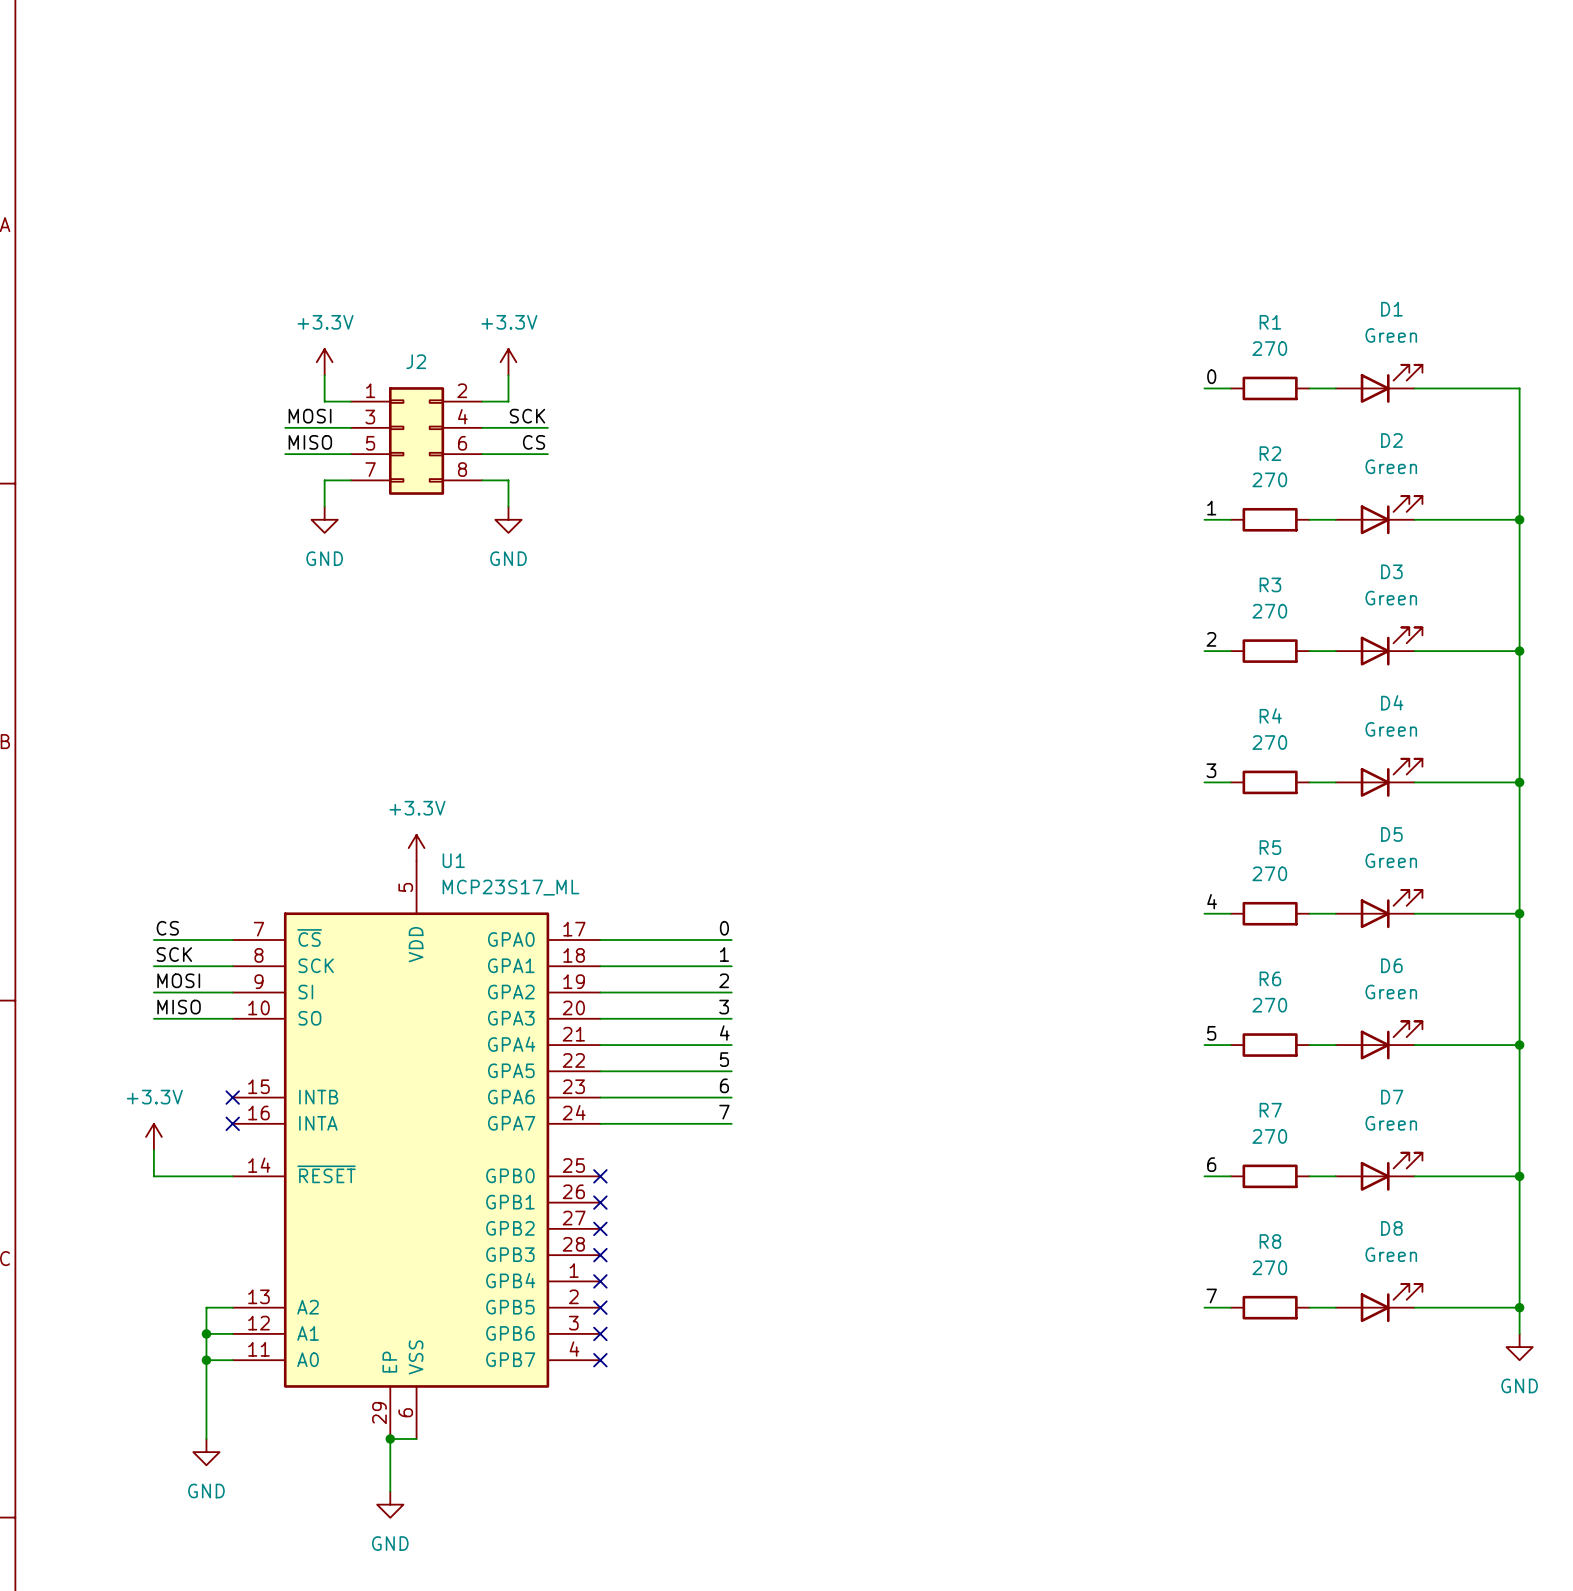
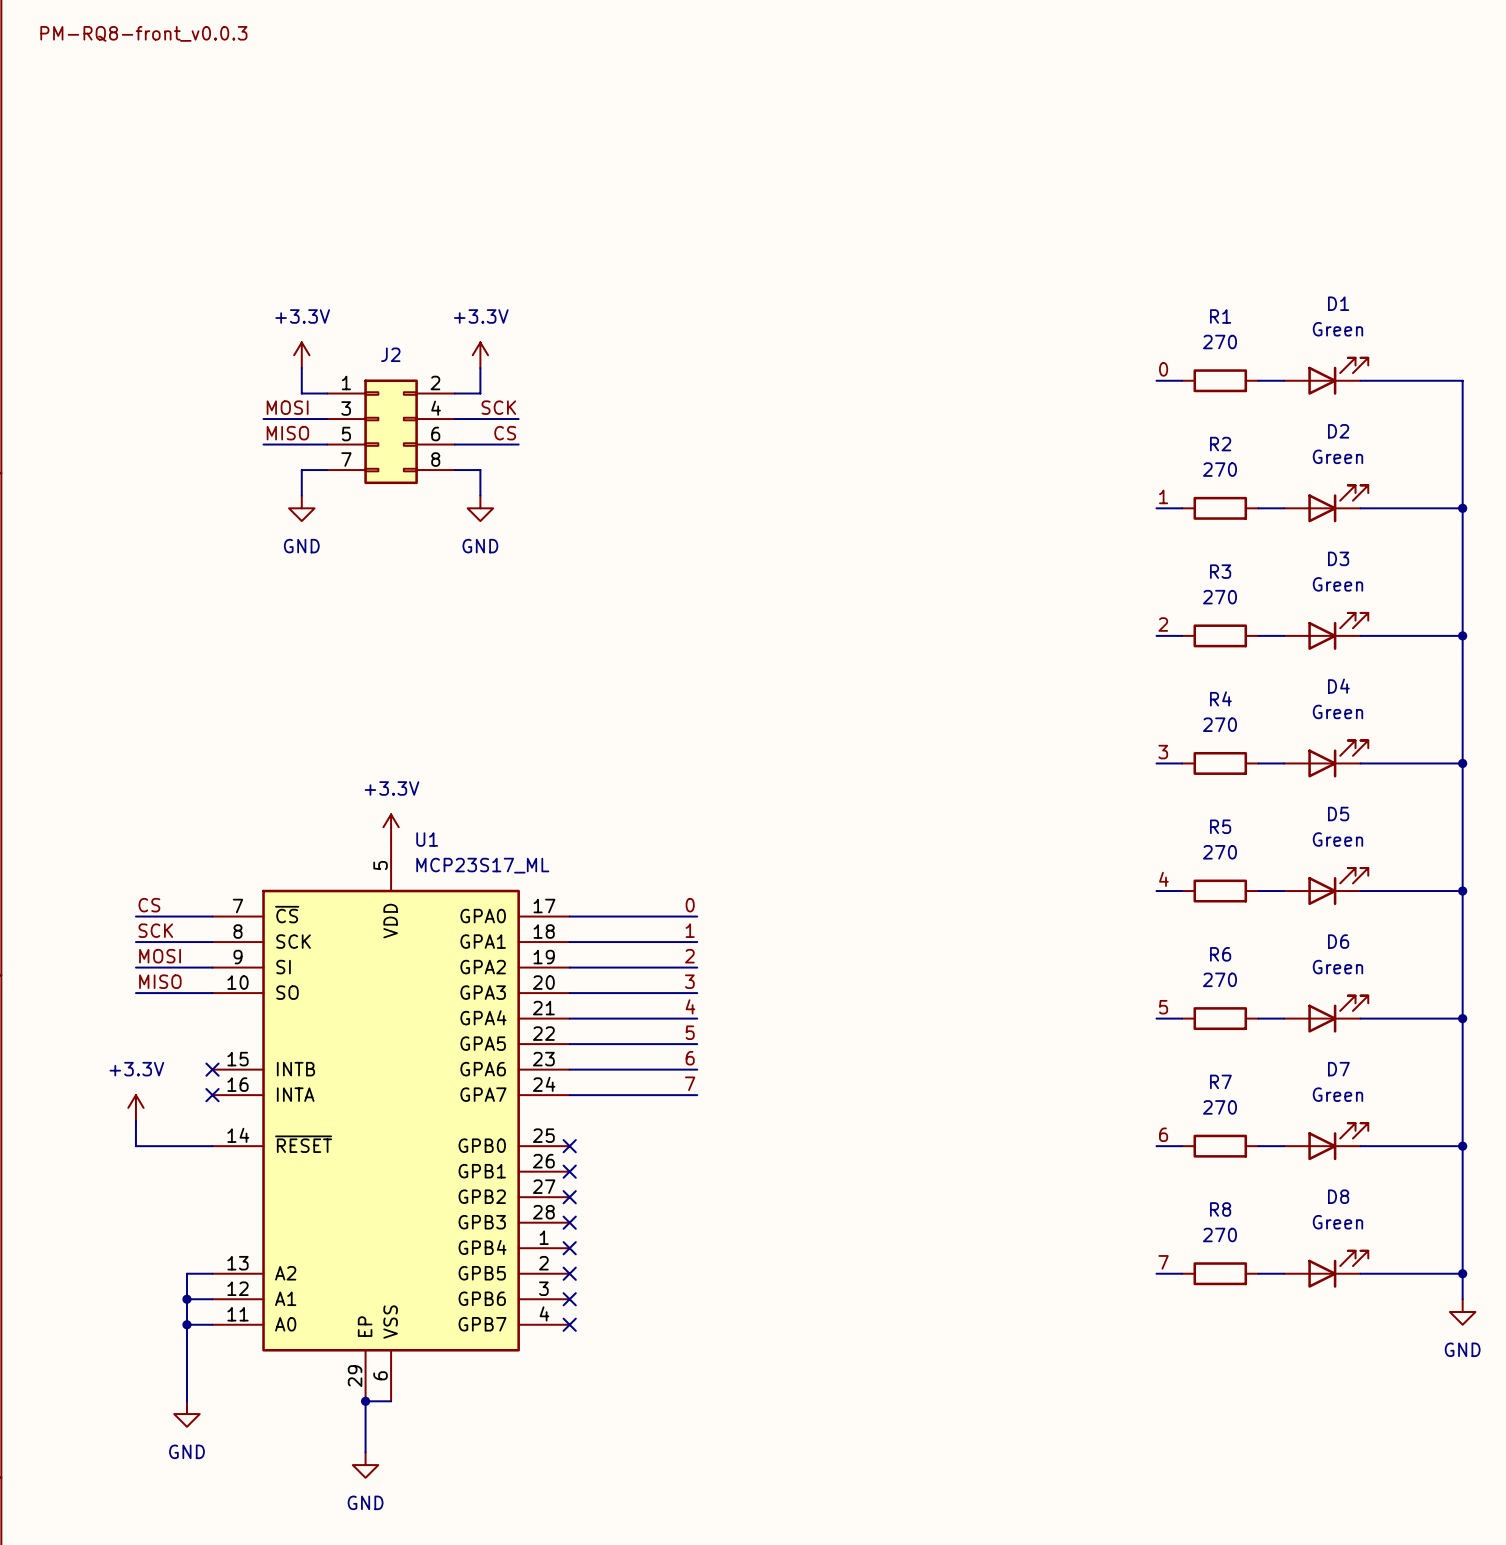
part: none -> (143, 33)

